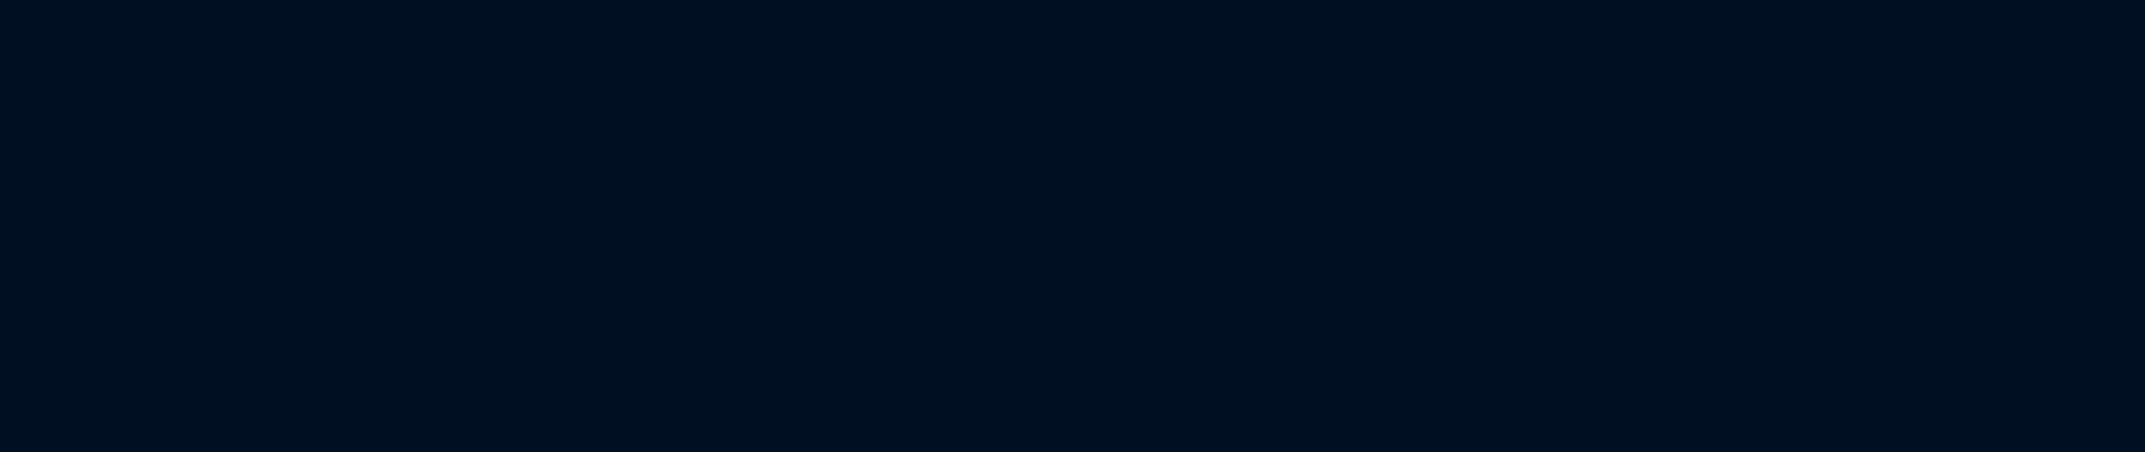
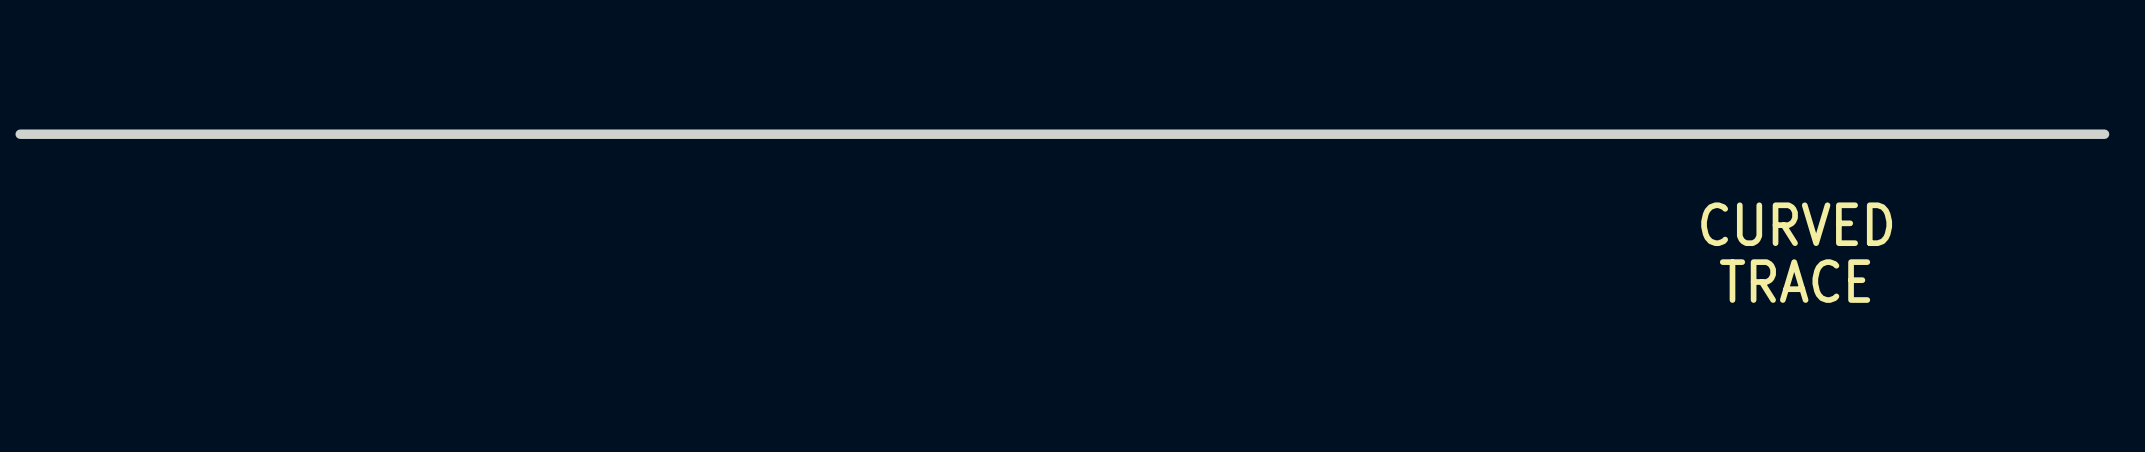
board edge: none -> (20, 134) (2104, 134)
text: none -> CURVED (1796, 224)
text: none -> TRACE (1795, 281)

